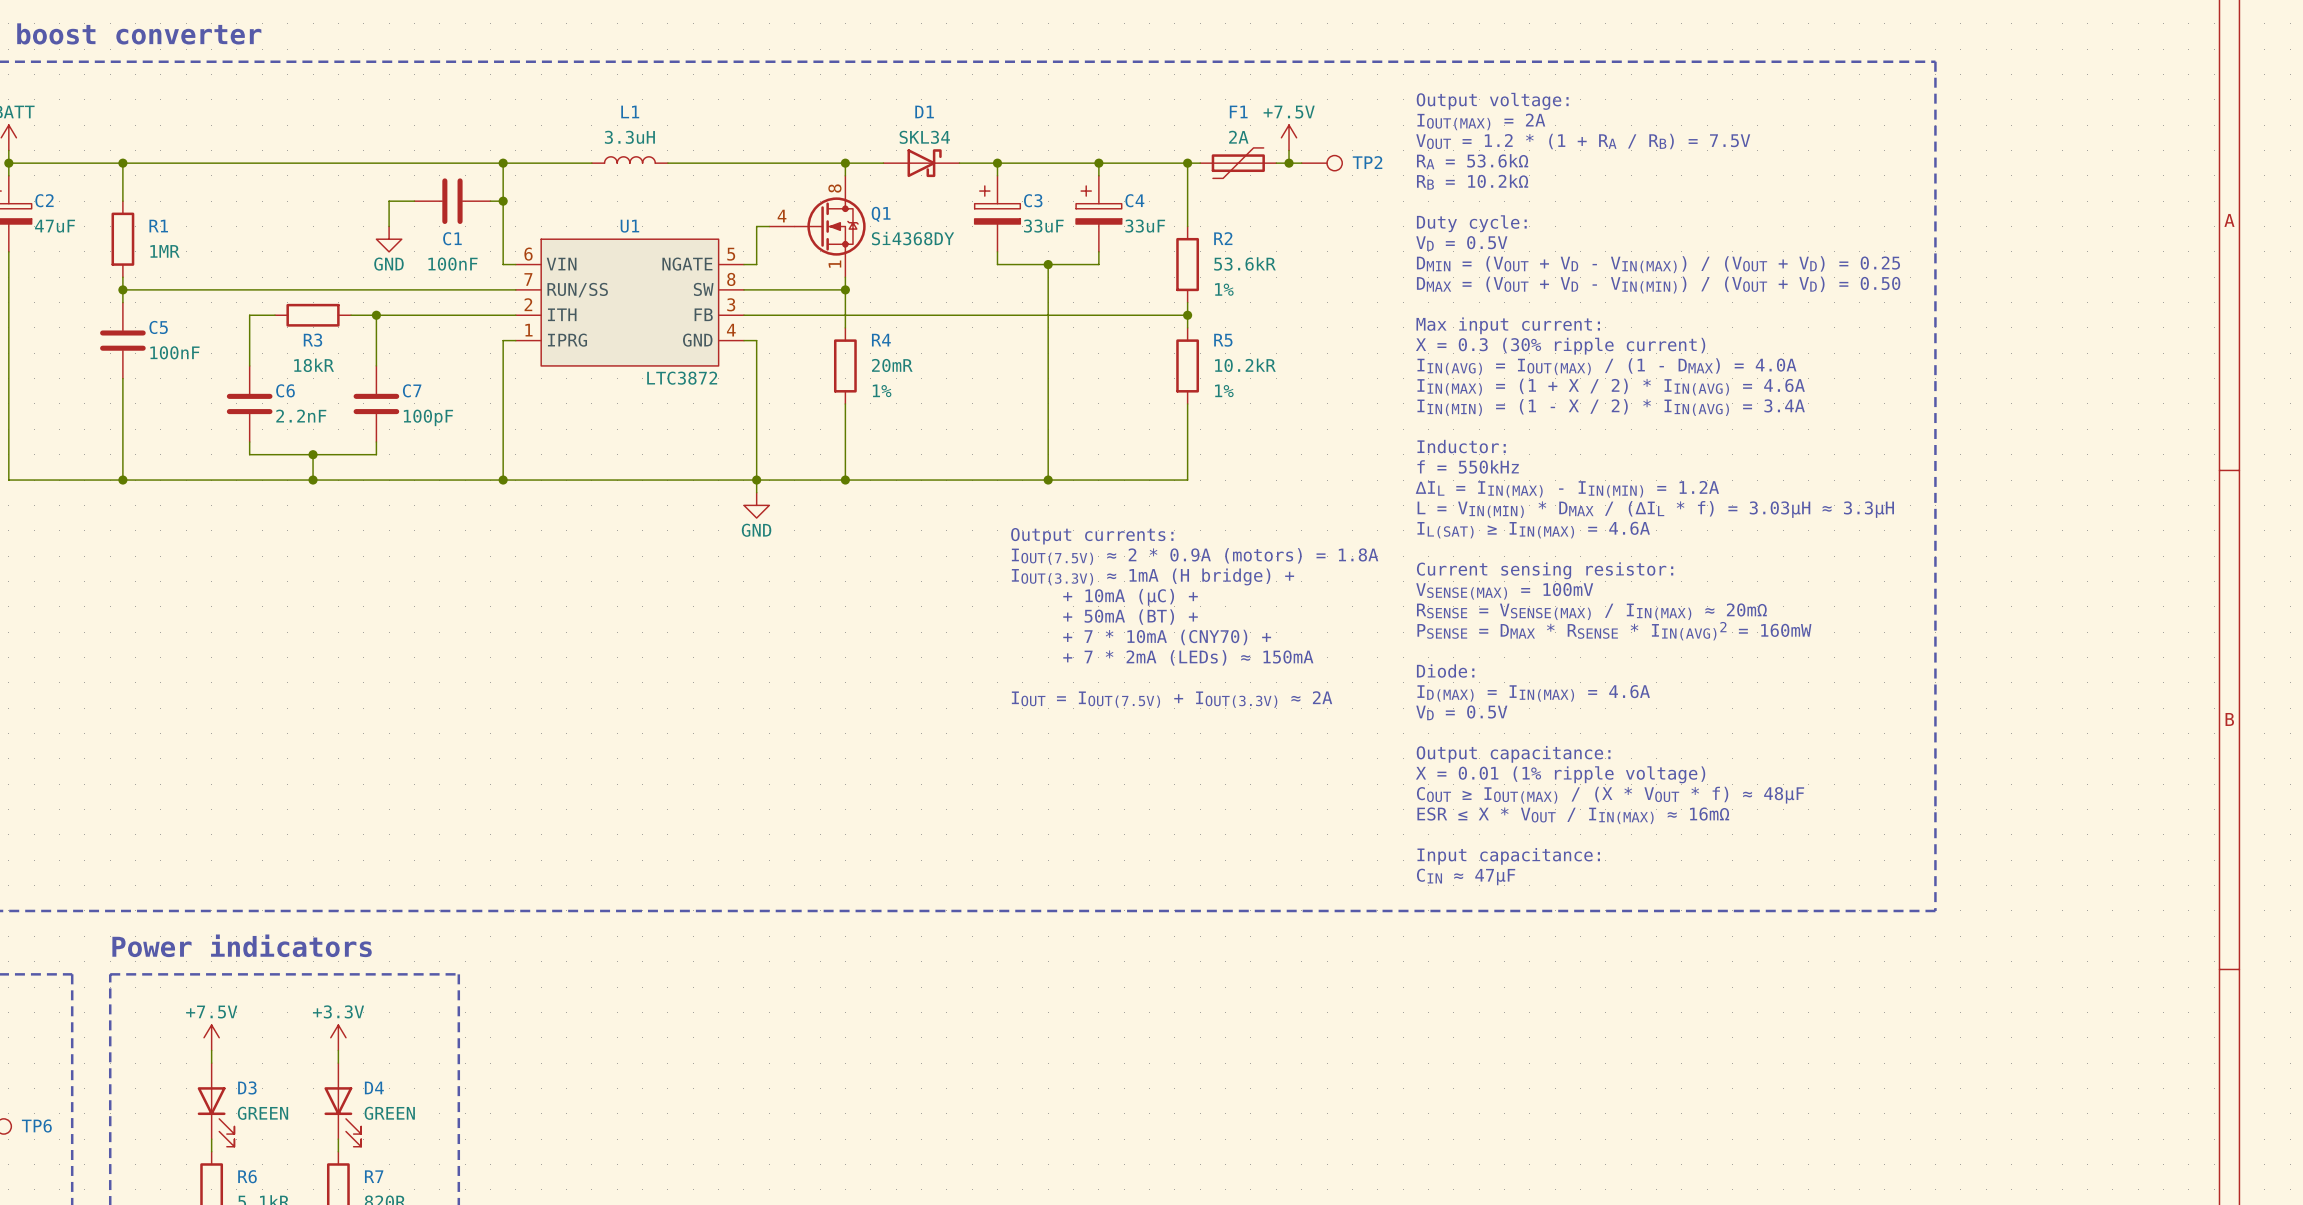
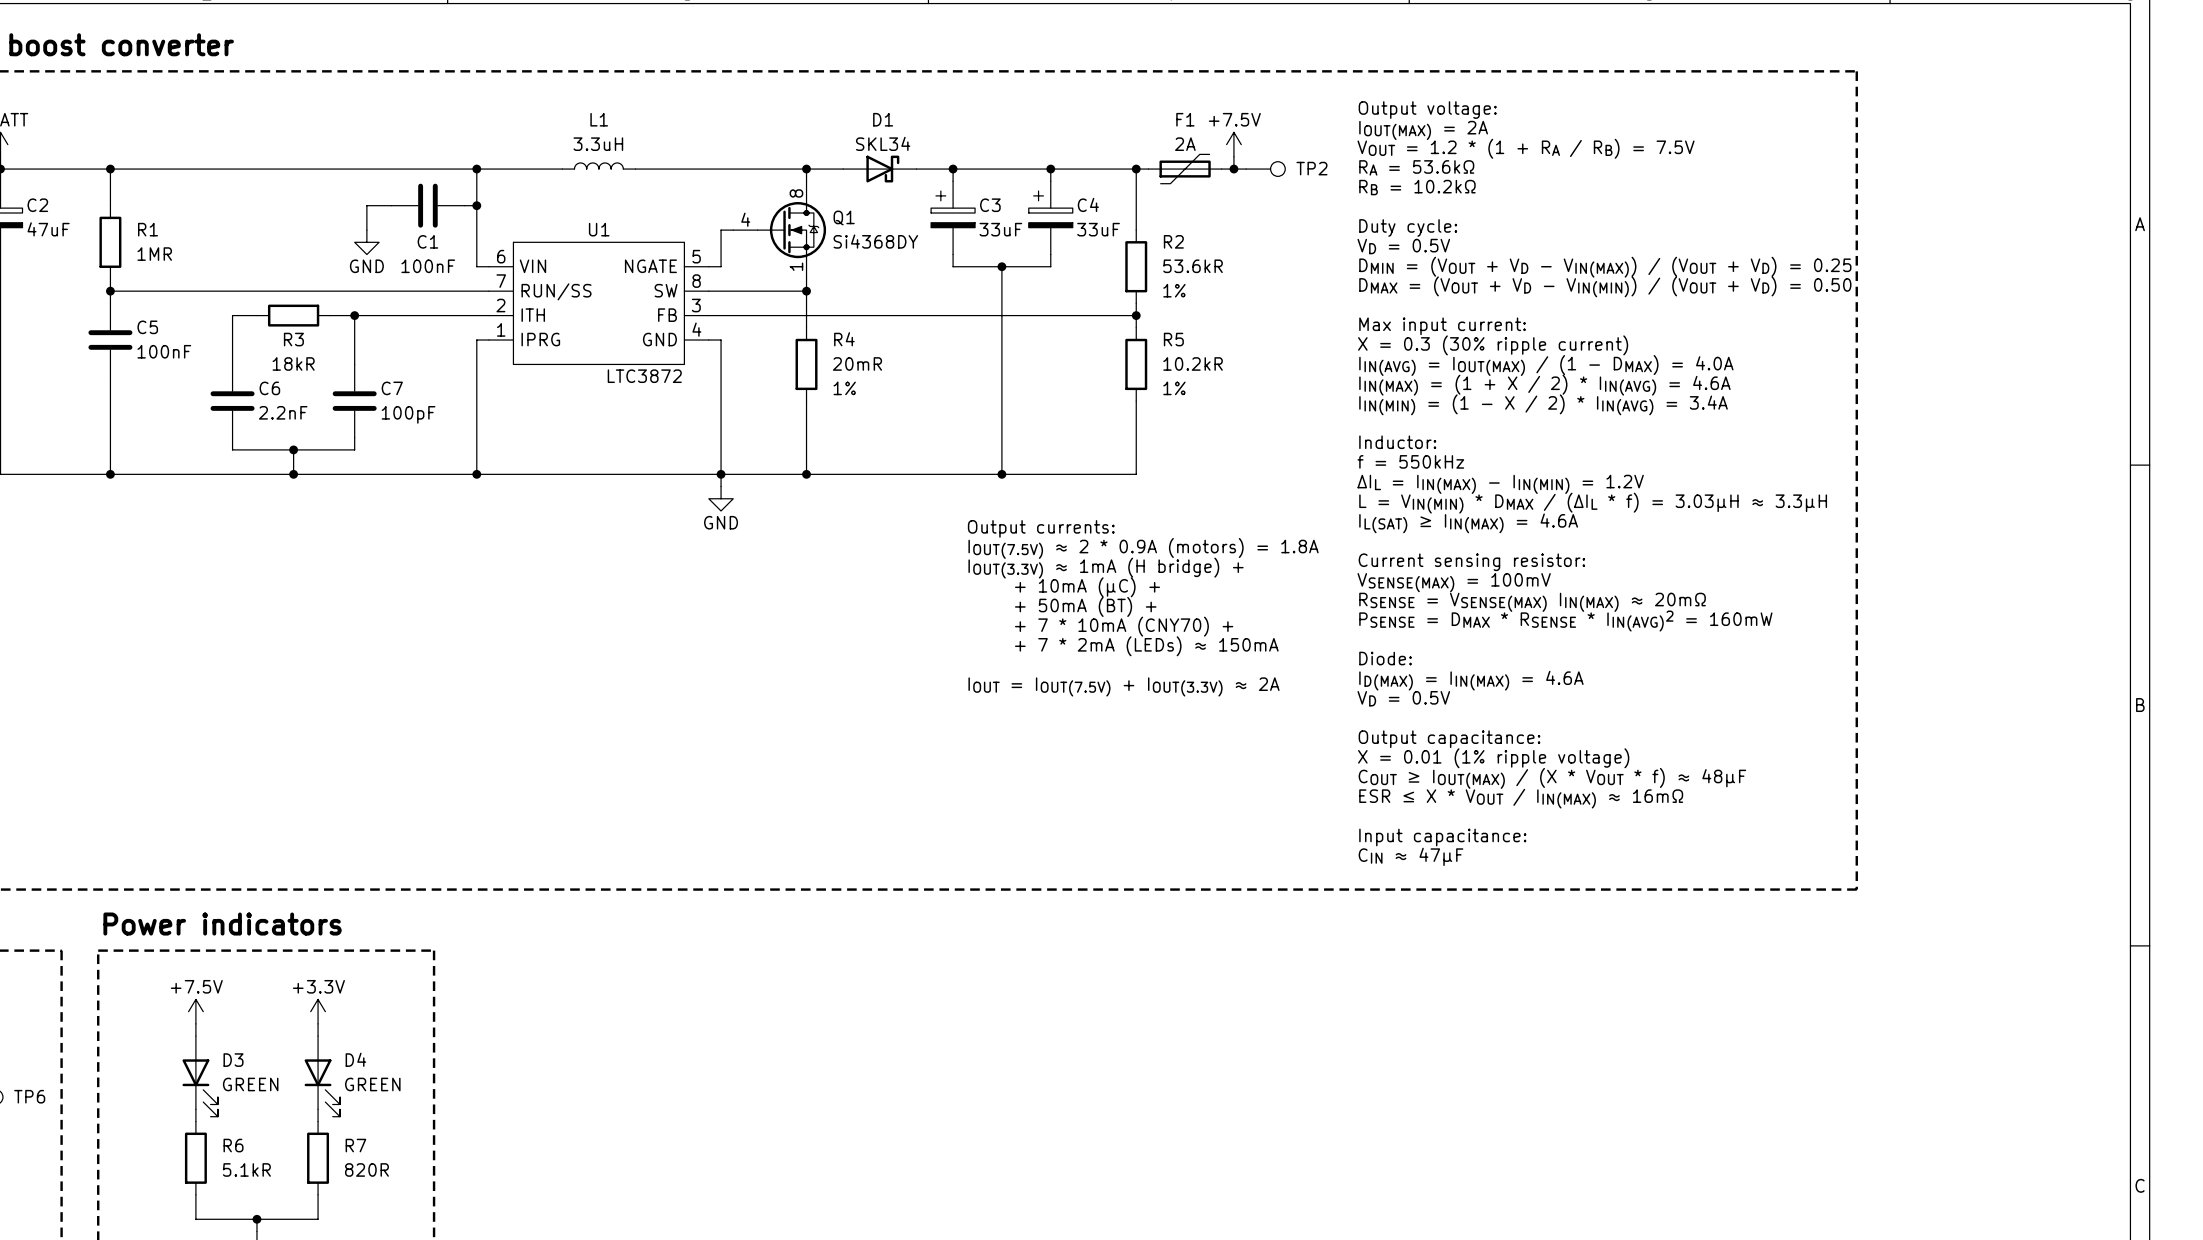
text: ∆IL = IIN(MAX) - IIN(MIN) = 1.2A (1567, 489) -> ∆IL = IIN(MAX) - IIN(MIN) = 1.2V (1500, 484)
text: RSENSE = VSENSE(MAX) / IIN(MAX) ≈ 20mΩ (1591, 611) -> RSENSE = VSENSE(MAX) IIN(MAX) ≈ 20mΩ (1532, 602)

